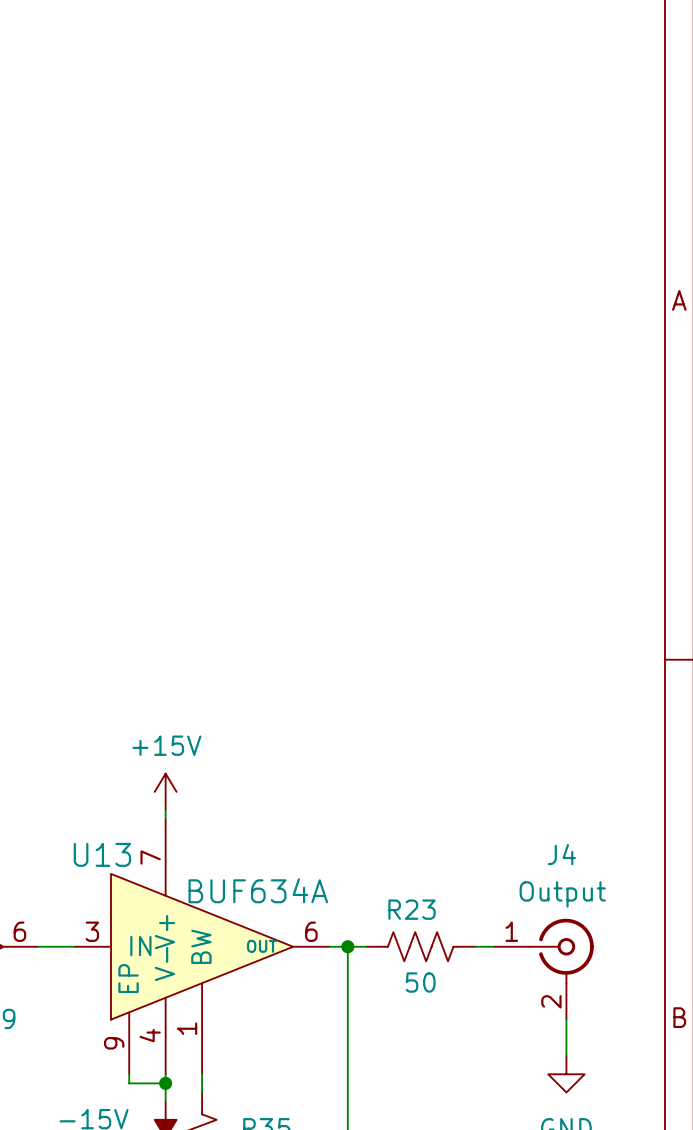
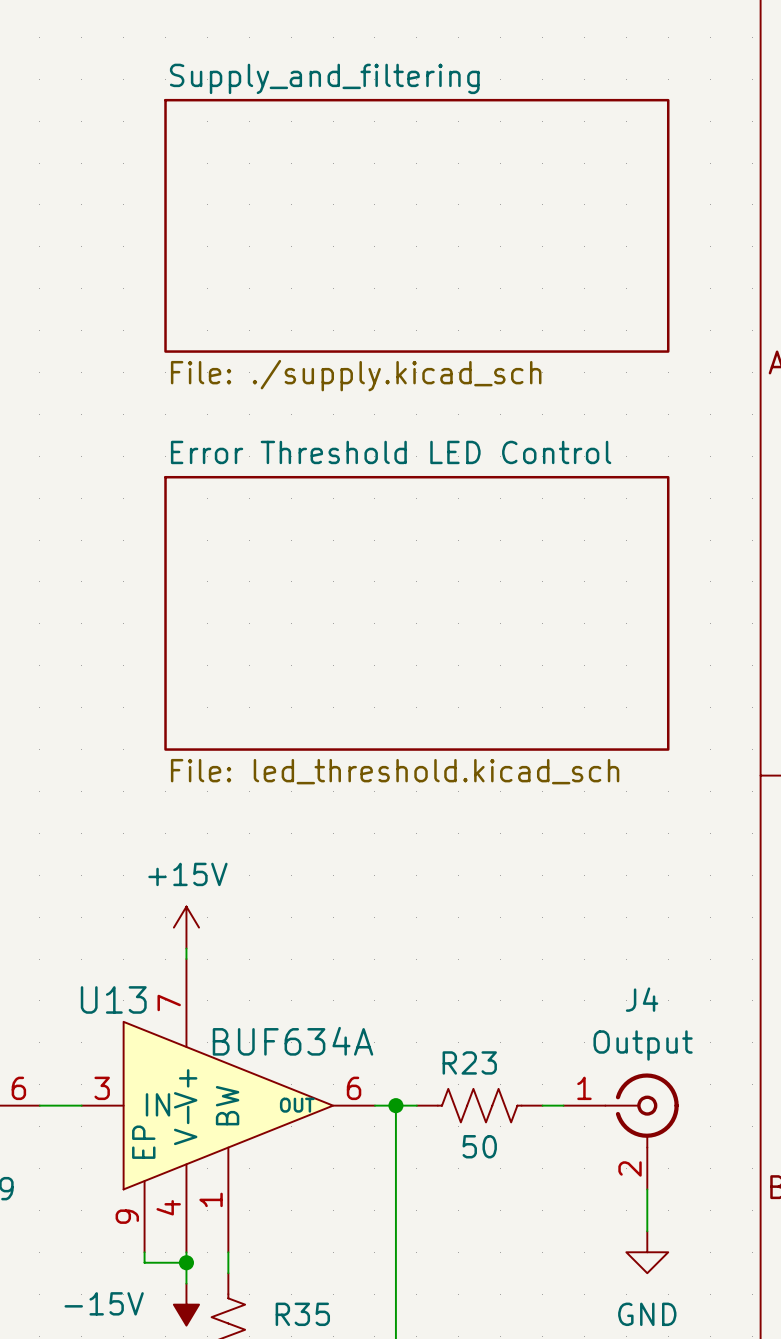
sheet Supply_and_filtering: none -> File: ./supply.kicad_sch (416, 225)
sheet Error Threshold LED Control: none -> File: led_threshold.kicad_sch (416, 613)

